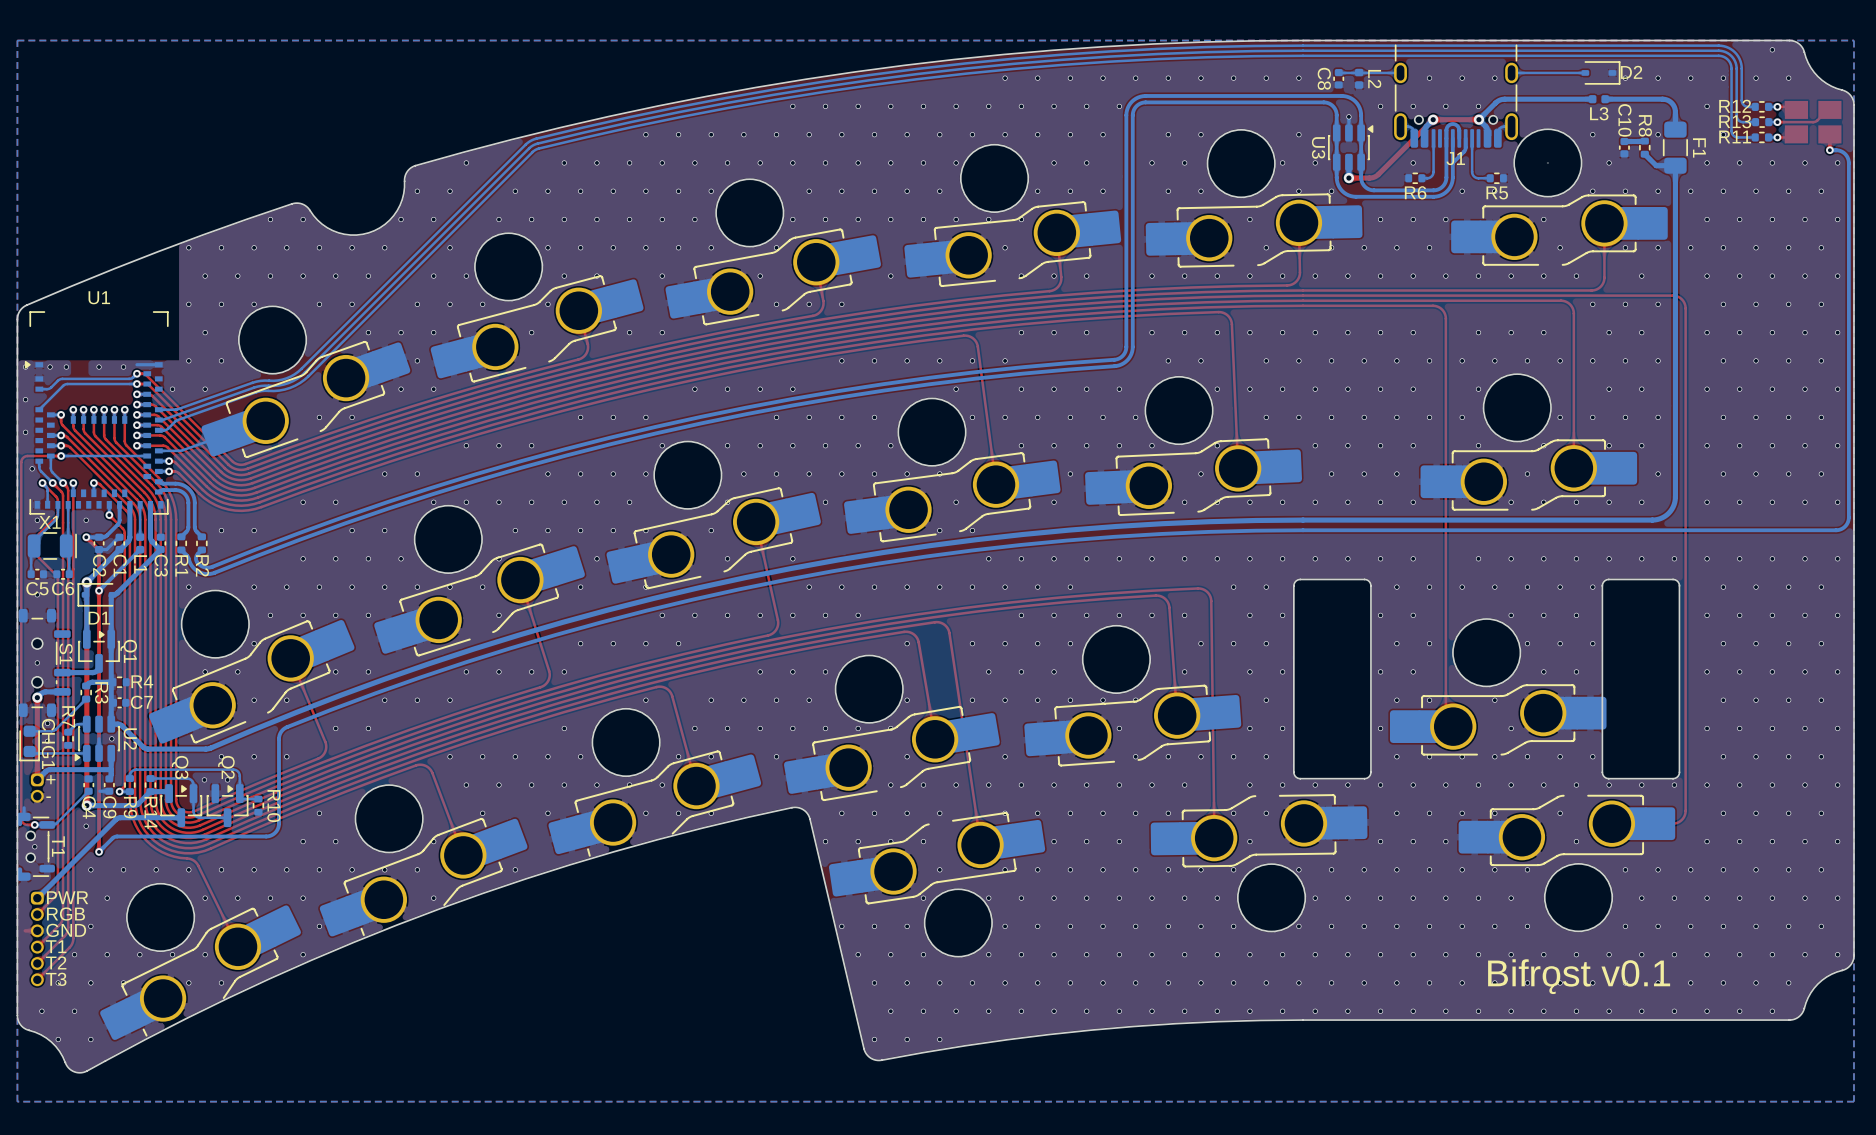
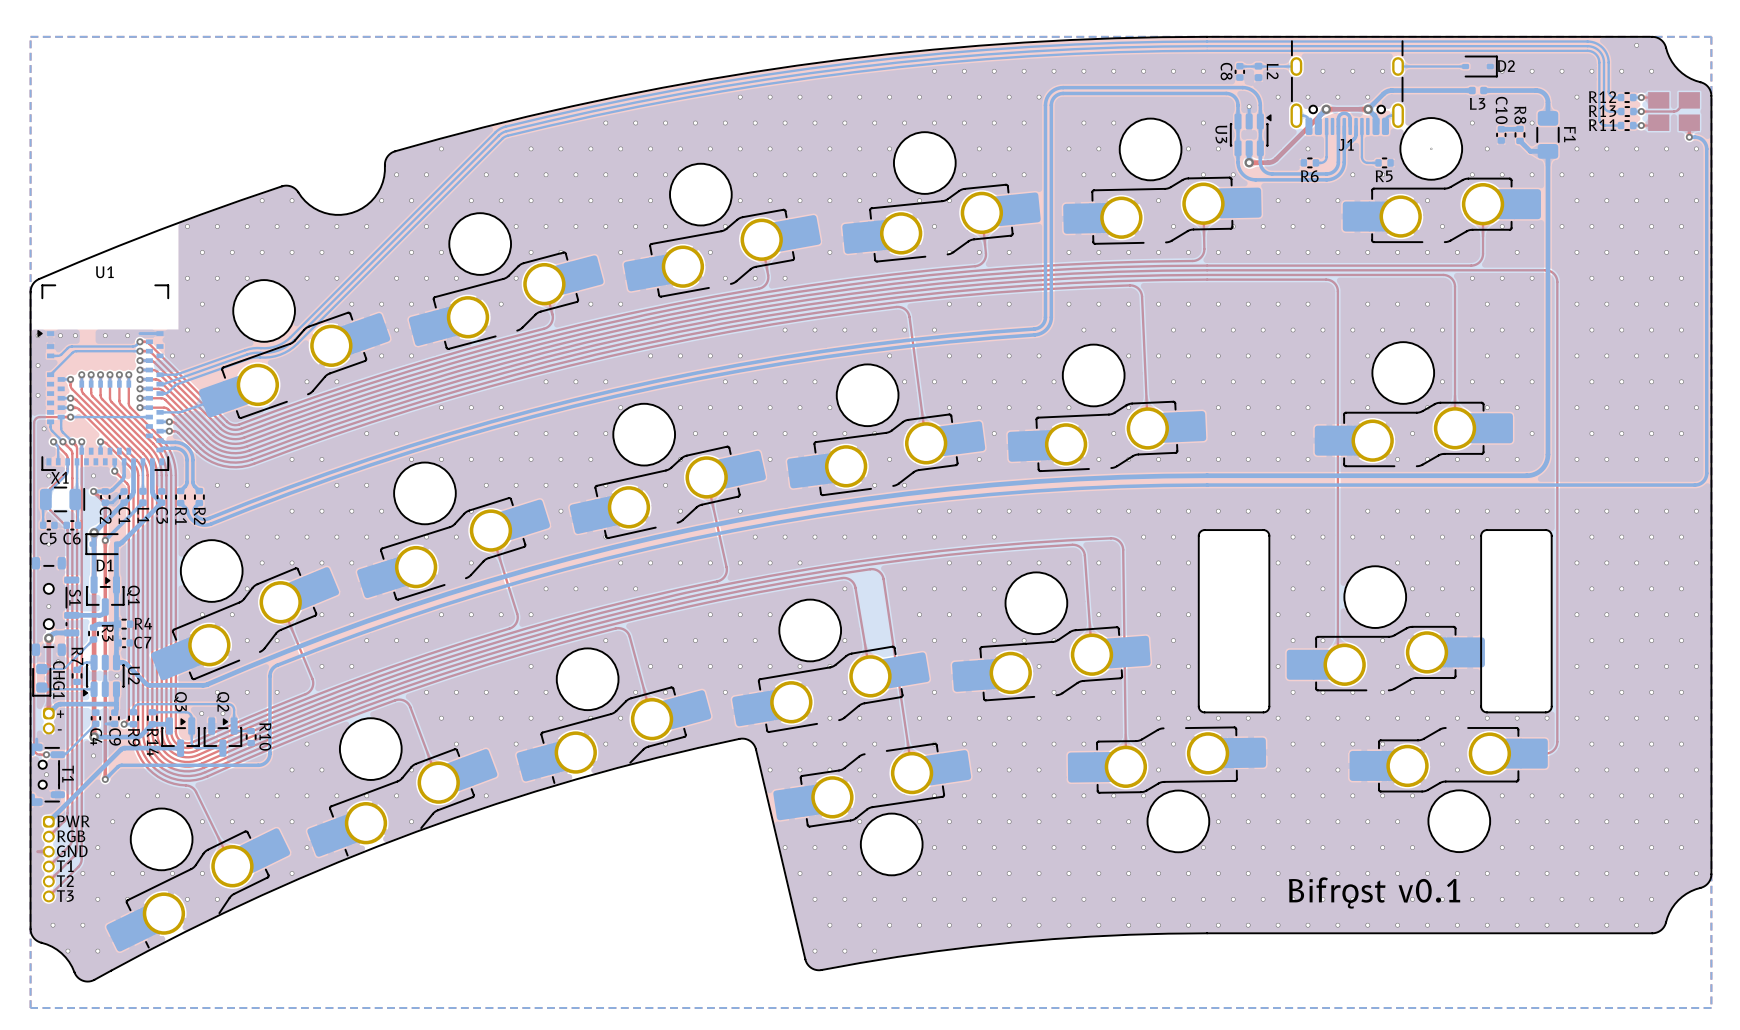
text position: Bifrǫst v0.1 (1579, 976) -> Bifrǫst v0.1 (1374, 892)

